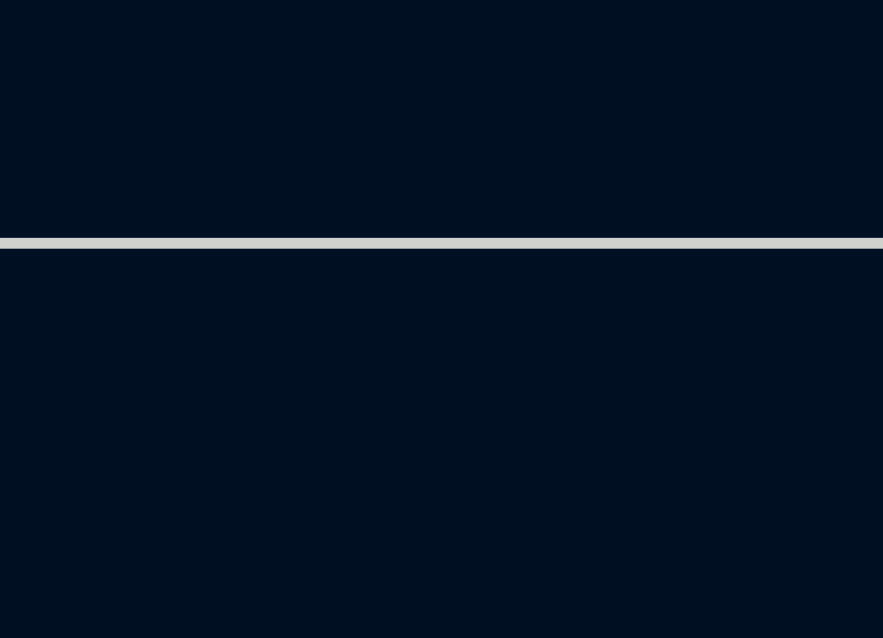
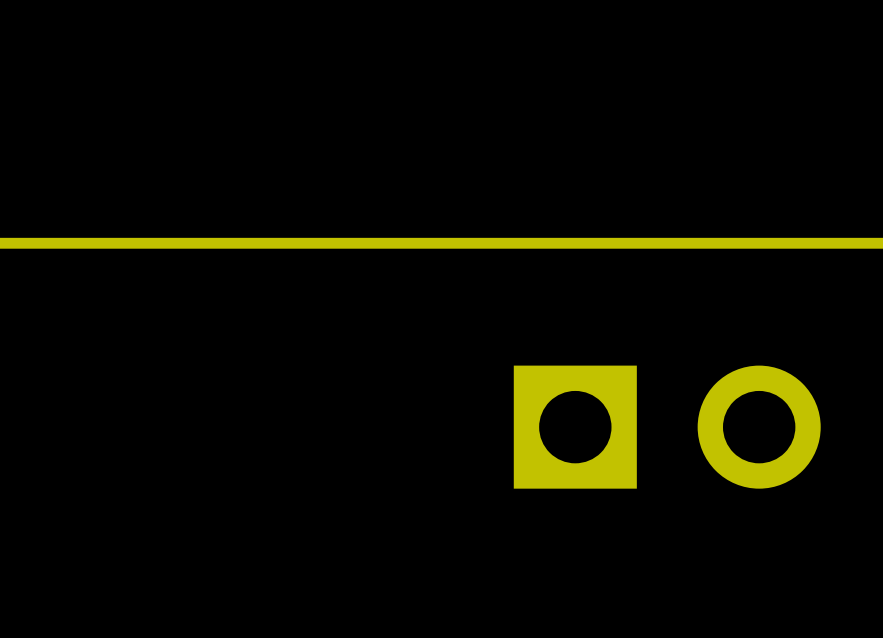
part: none -> (667, 427)

